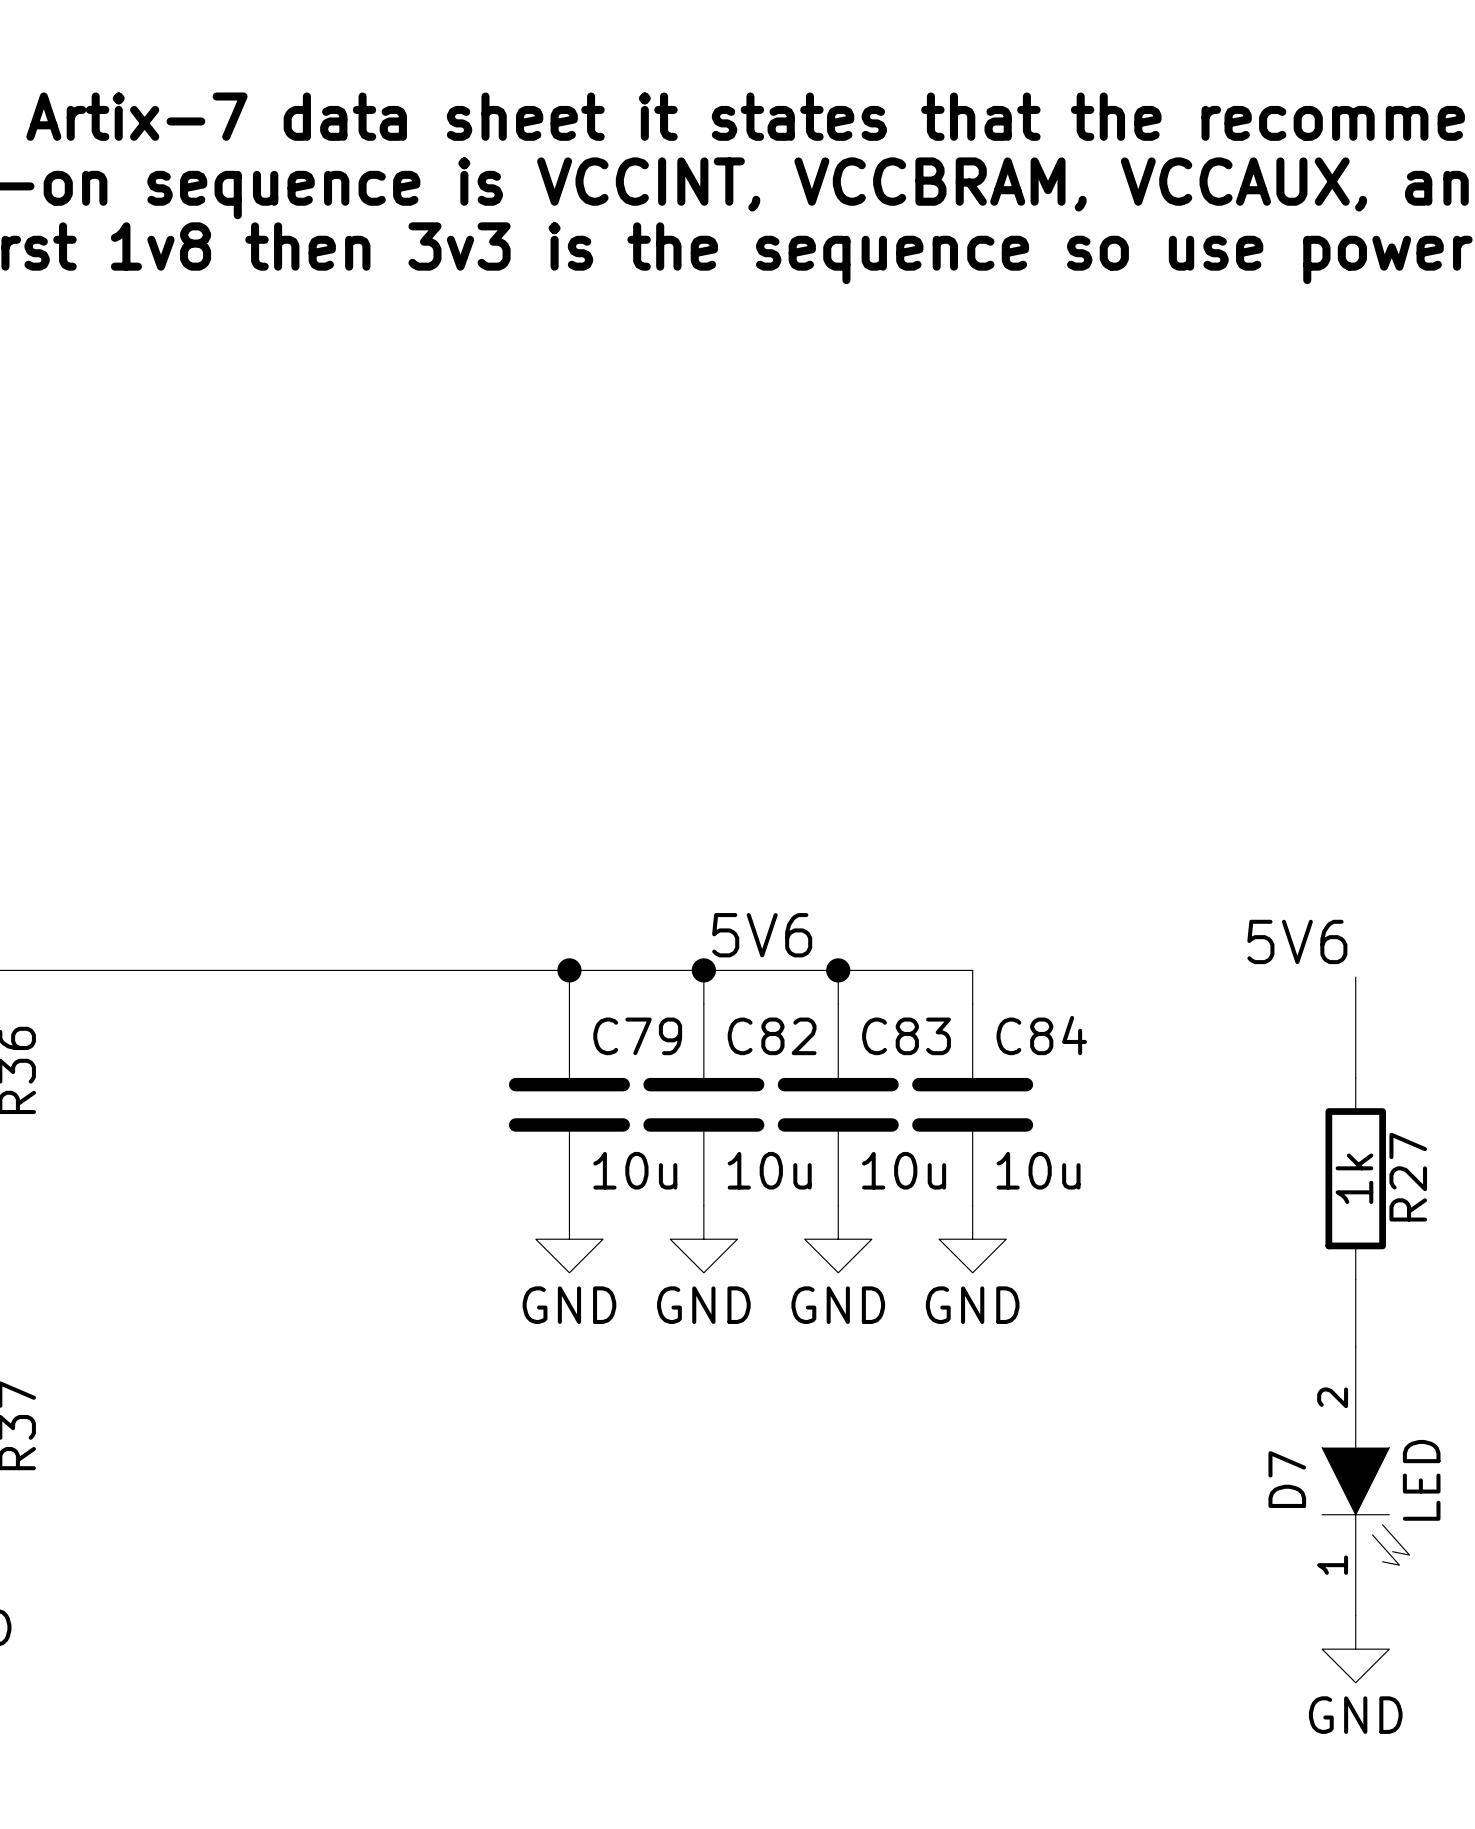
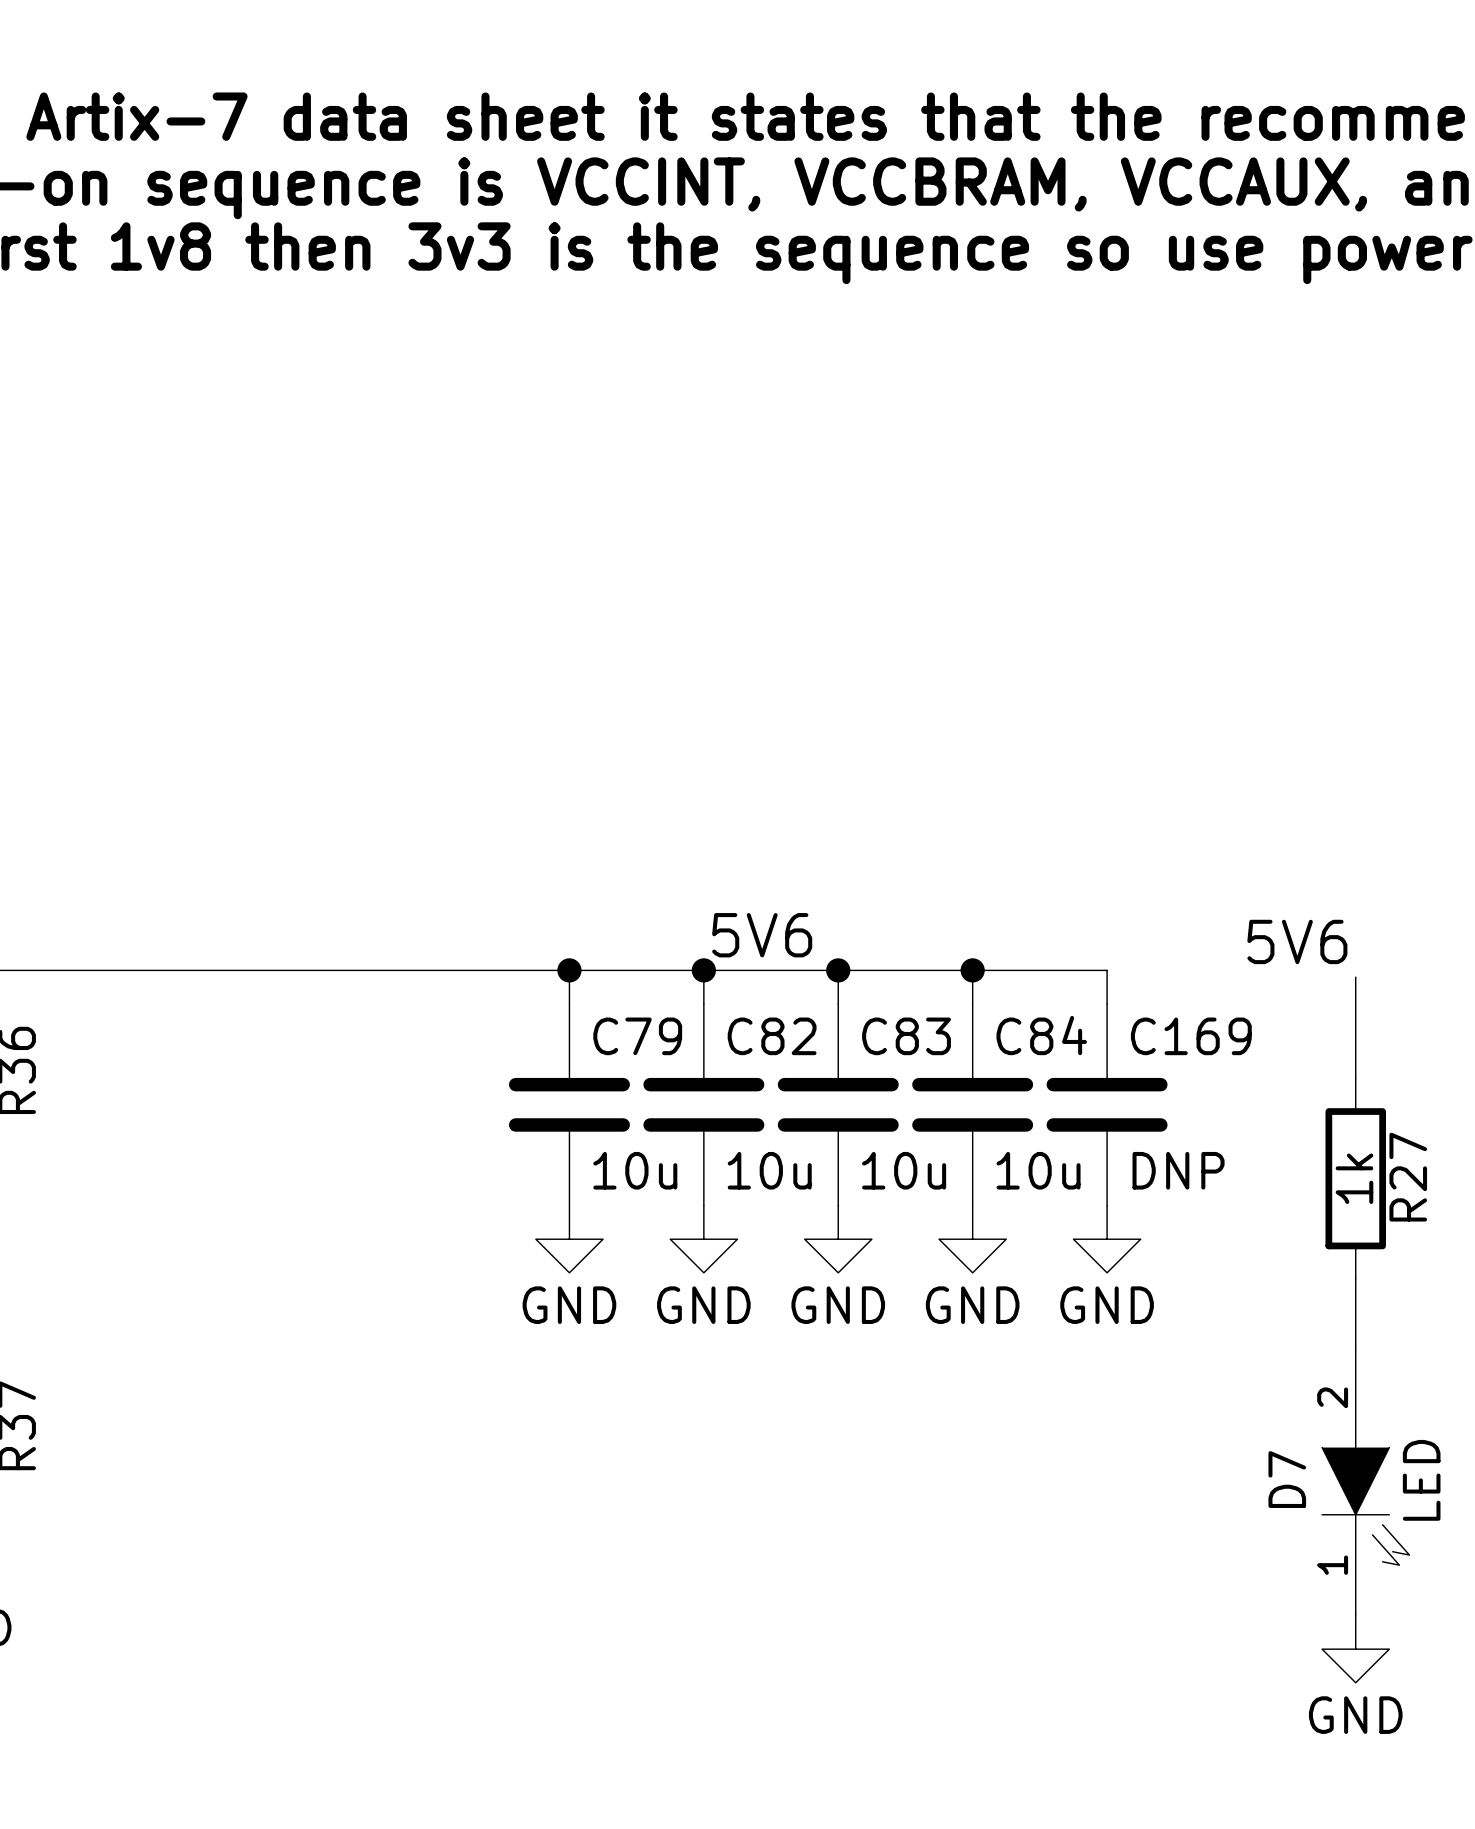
wire: none -> (972, 970) (1107, 970) (1107, 1004)
junction: none -> (972, 970)
C169: none -> DNP (1107, 1104)
power symbol: none -> GND (1107, 1239)

